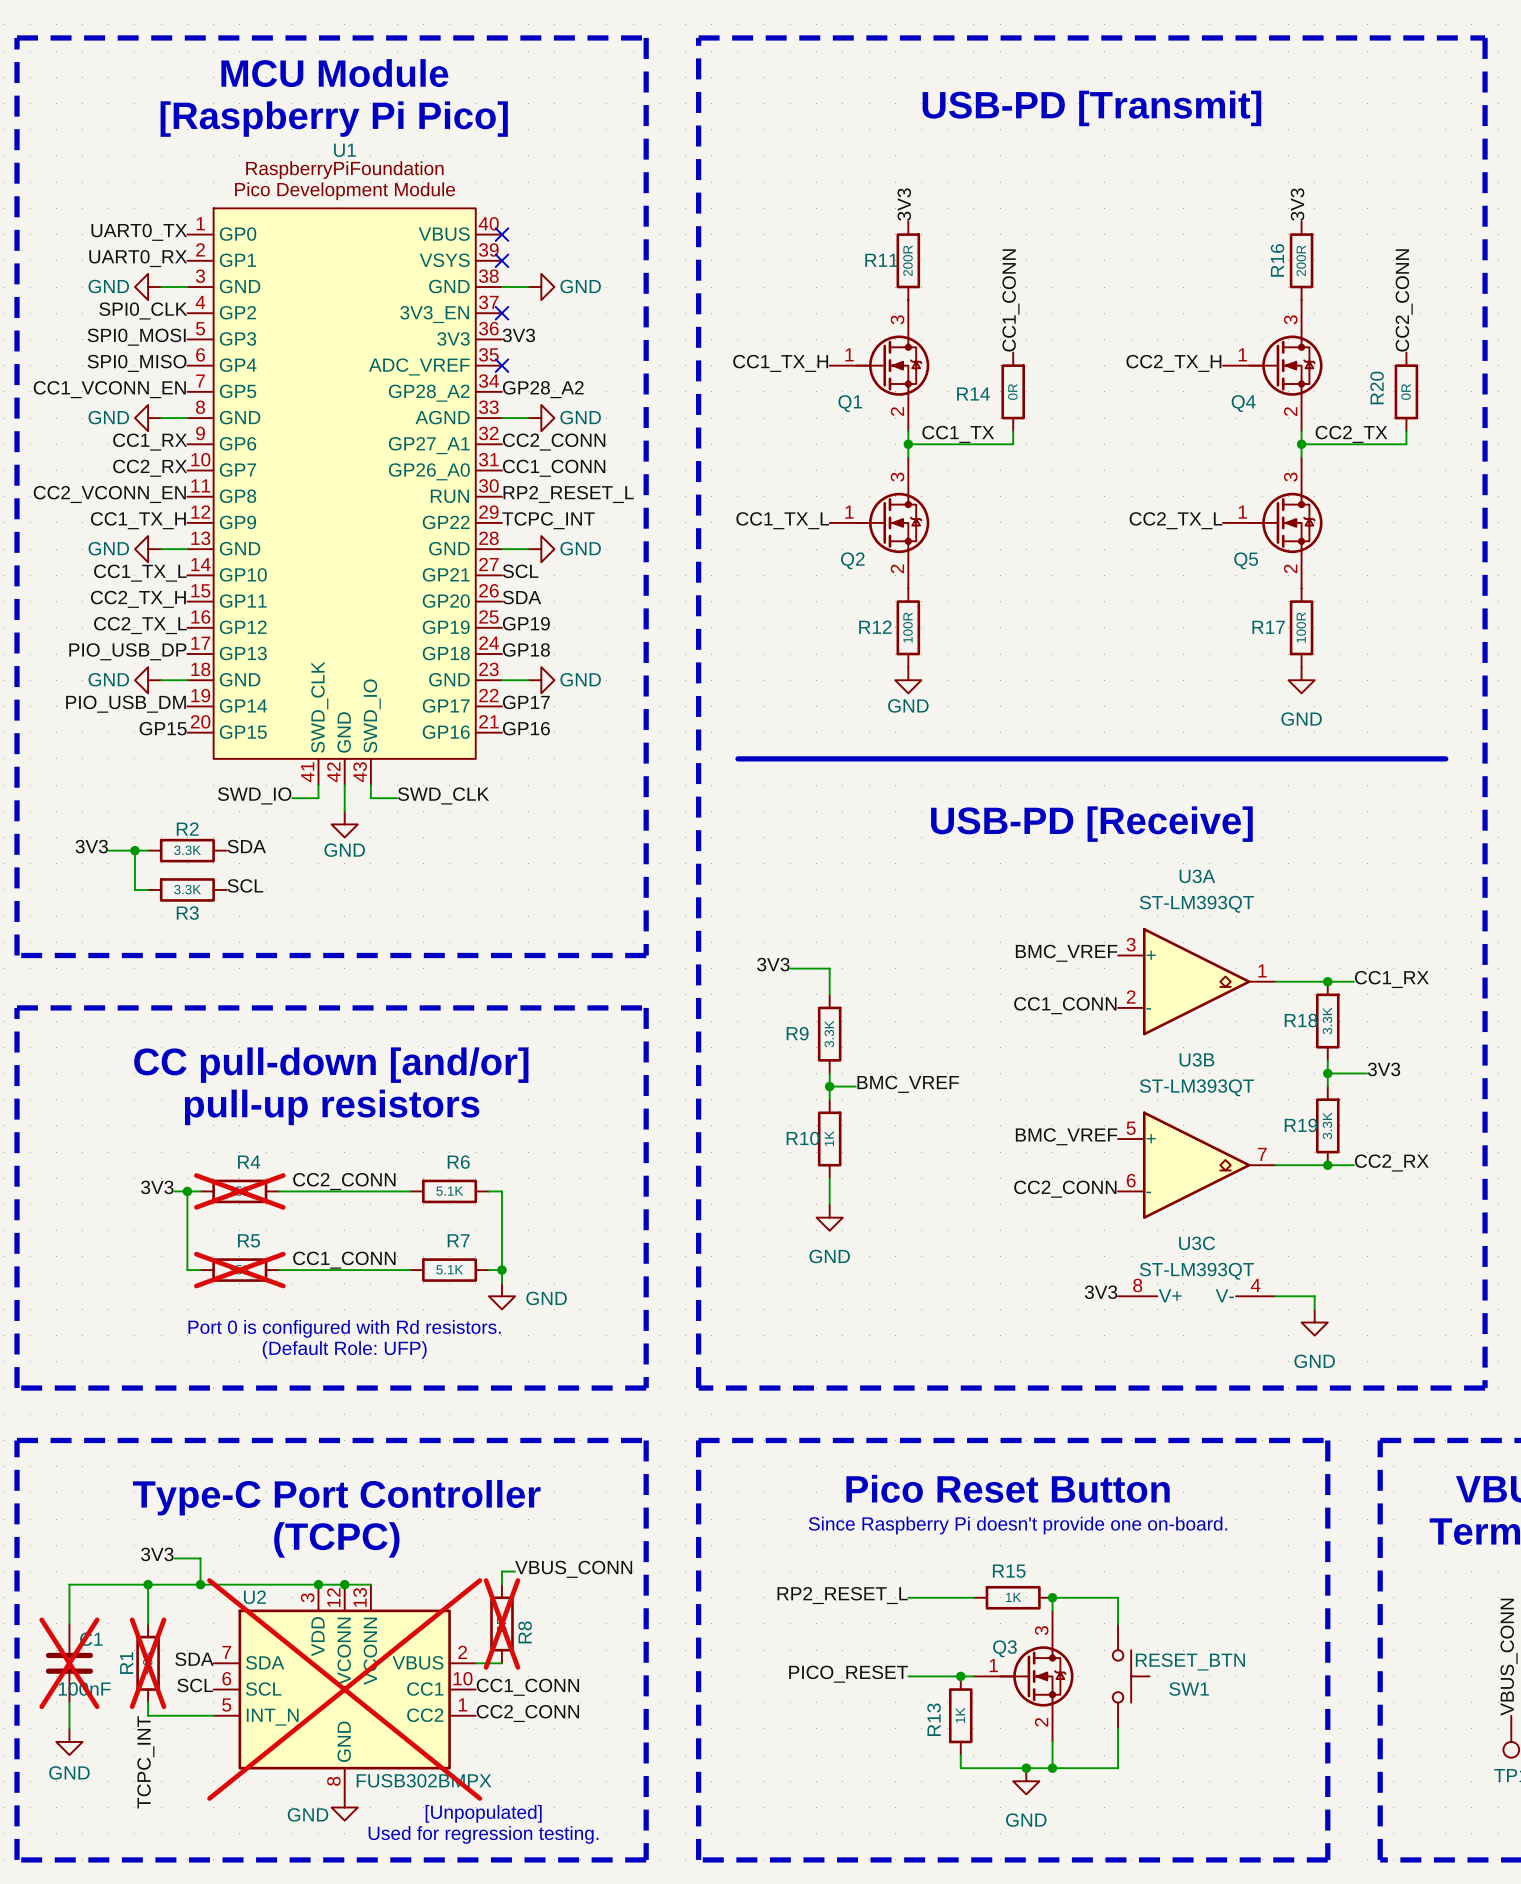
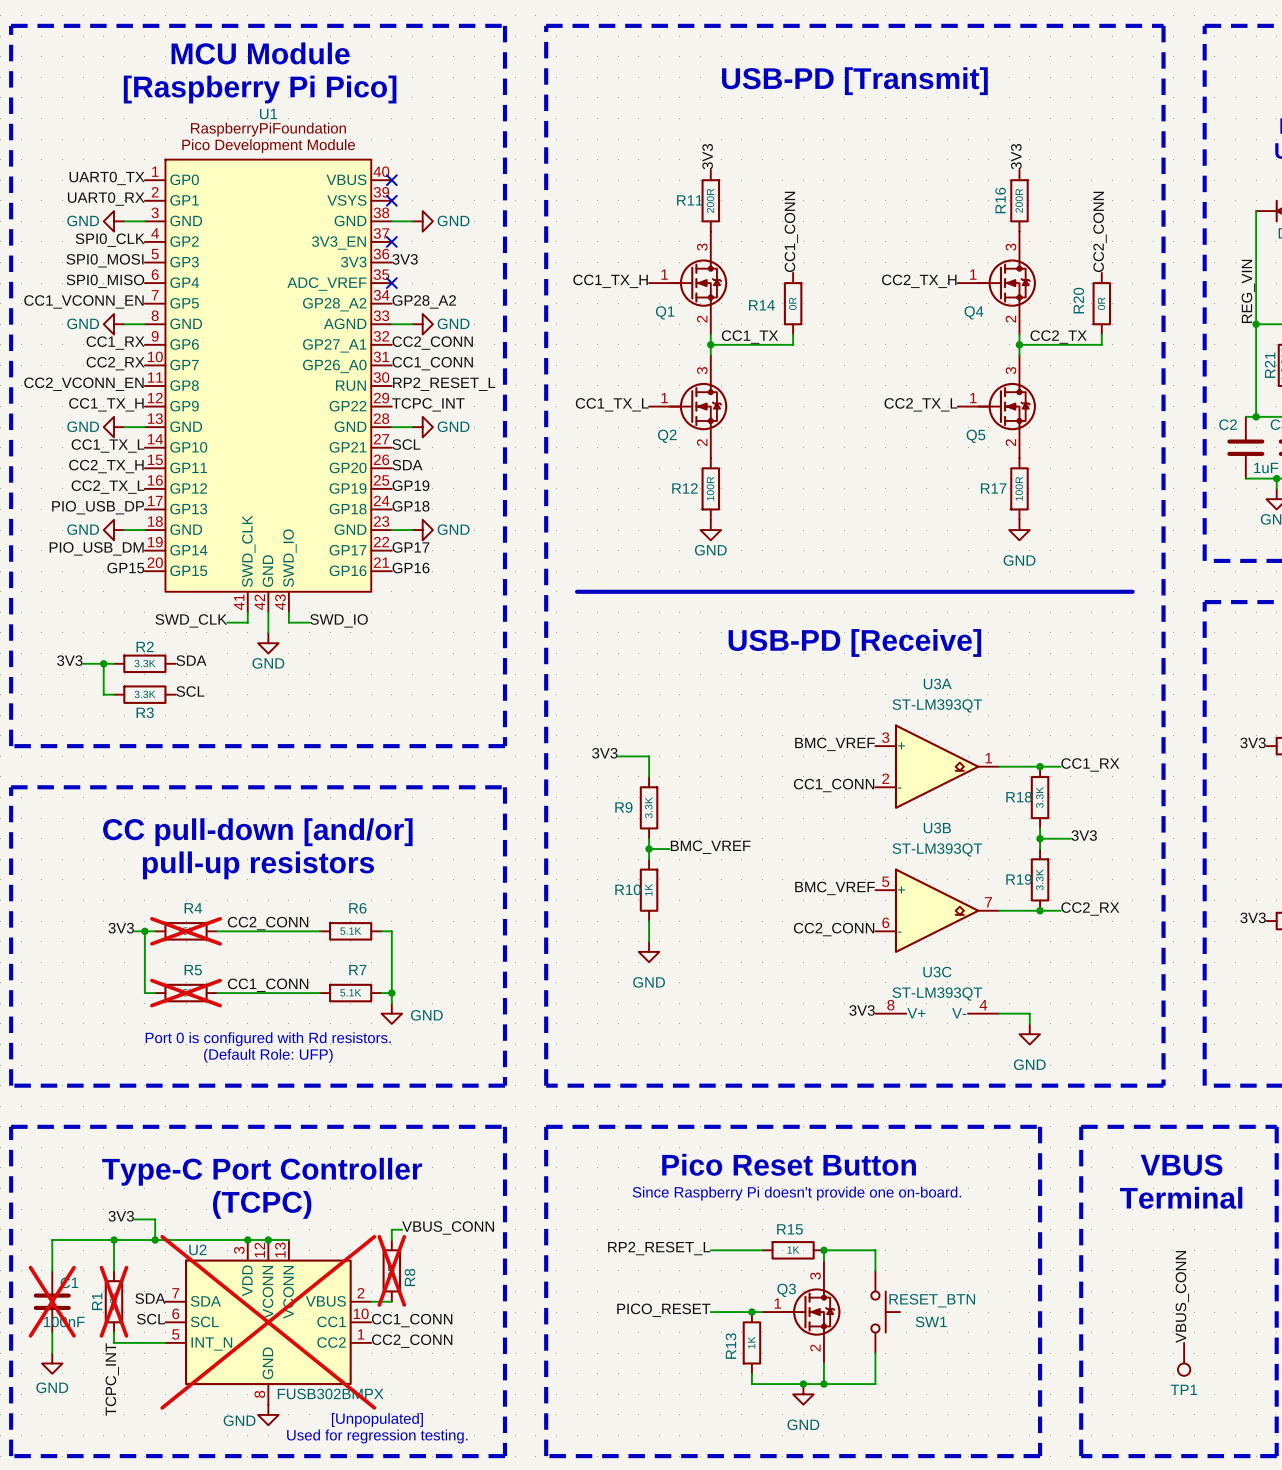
label: SWD_IO (254, 795) -> SWD_CLK (191, 620)
label: SWD_CLK (443, 795) -> SWD_IO (338, 620)

